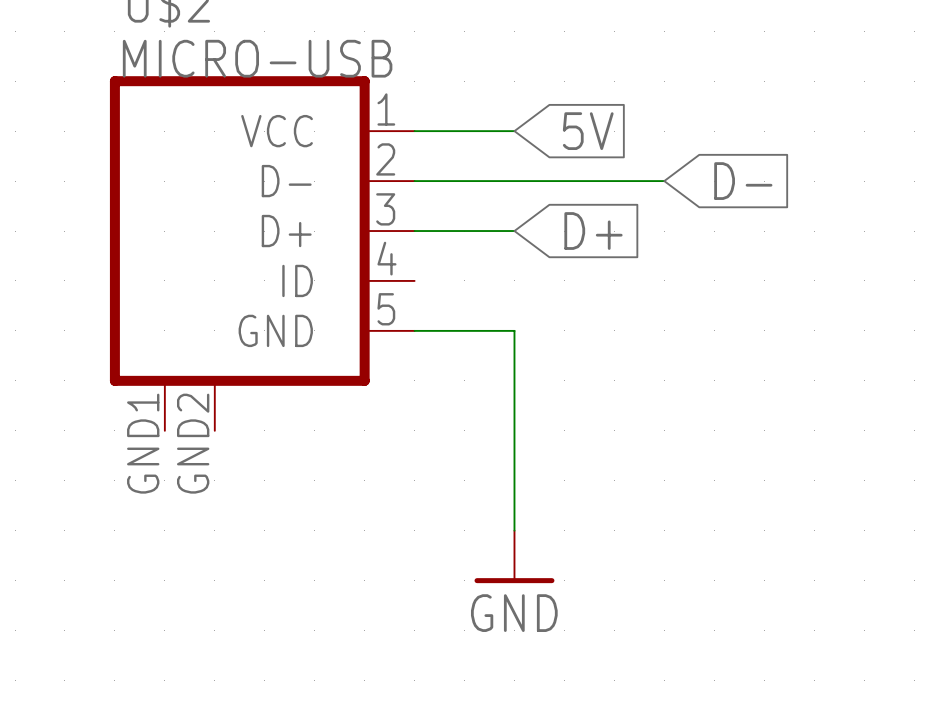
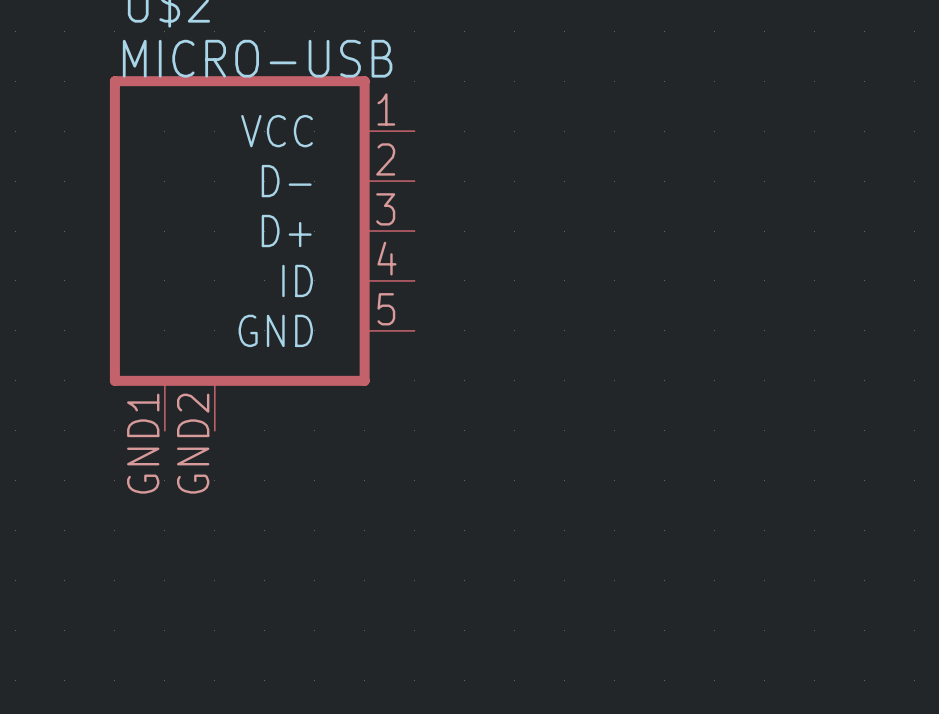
wire: (414, 131) (514, 131) -> none
global label: 5V (588, 131) -> none
wire: (414, 181) (664, 181) -> none
global label: D- (743, 181) -> none
wire: (414, 231) (514, 231) -> none
global label: D+ (593, 231) -> none
wire: (414, 330) (514, 330) (514, 530) -> none
power symbol: GND (514, 556) -> none

